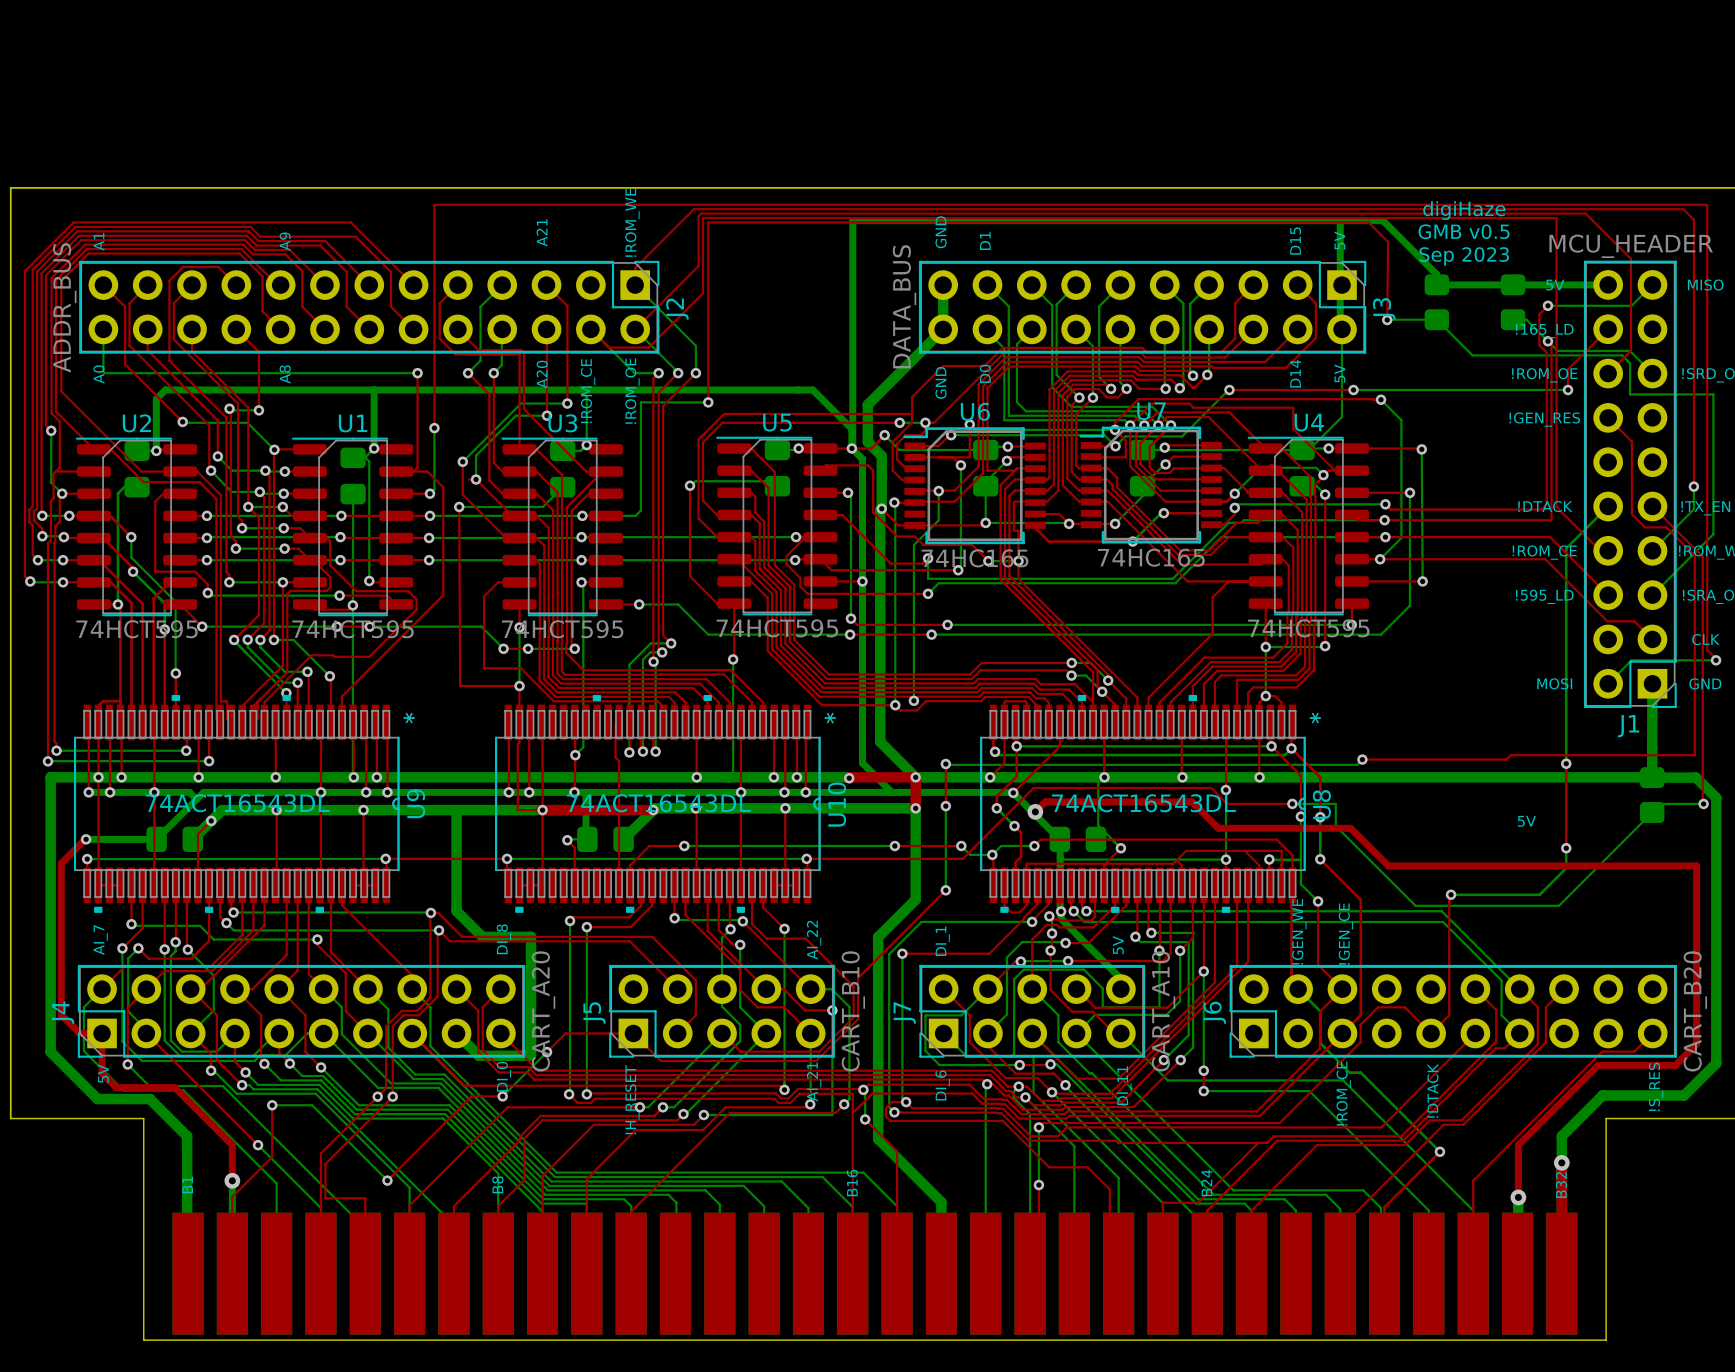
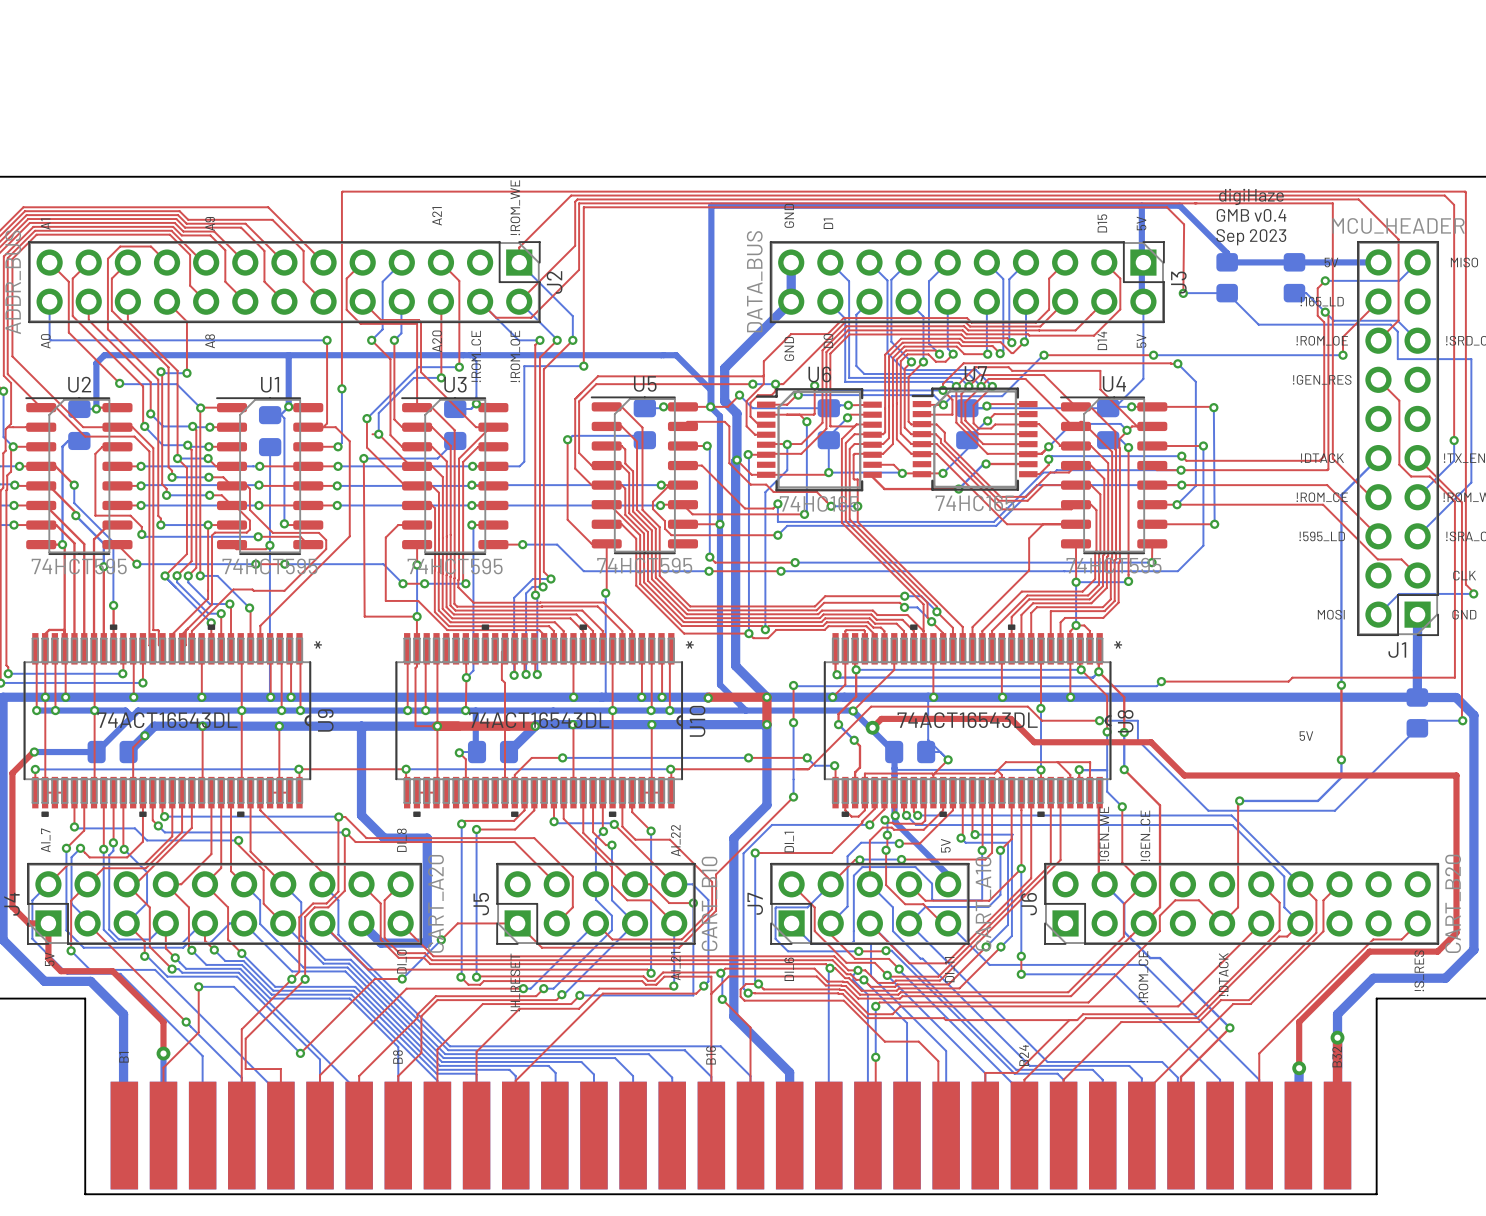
text: GMB v0.5 (1464, 231) -> GMB v0.4 (1251, 215)
bottom track: (1034, 846) (1001, 846) (992, 854) -> none
top track: (1034, 846) (1040, 839) (1276, 839) (1292, 855) (1292, 885) -> none
via: (1034, 846) -> none

